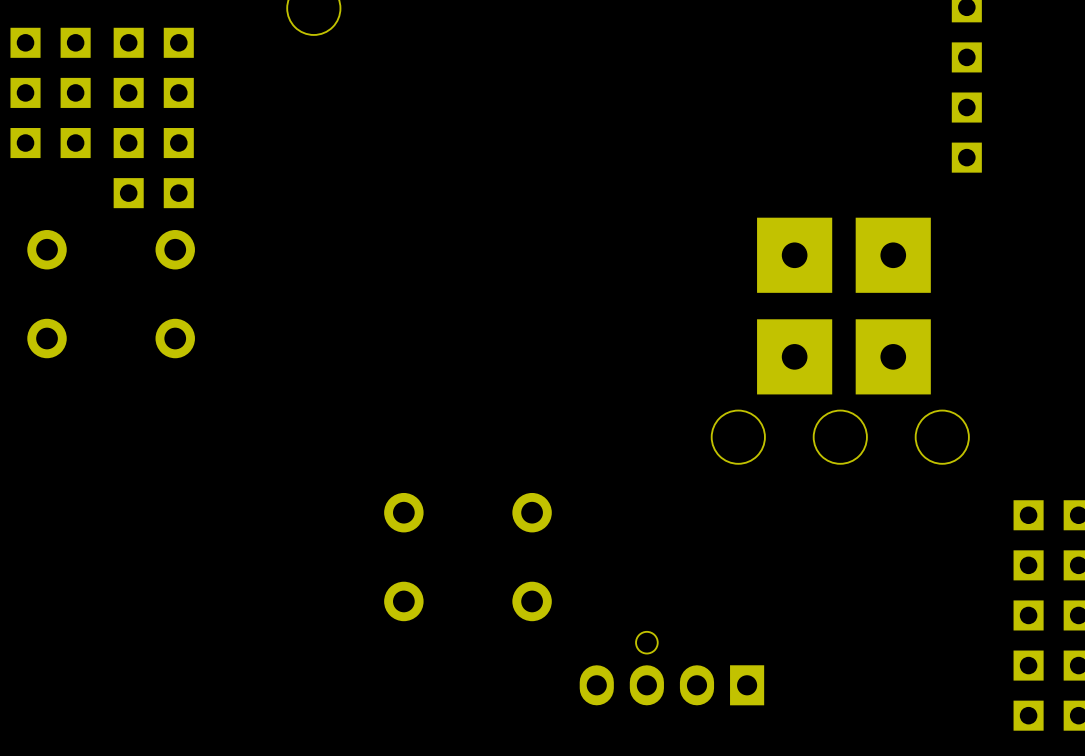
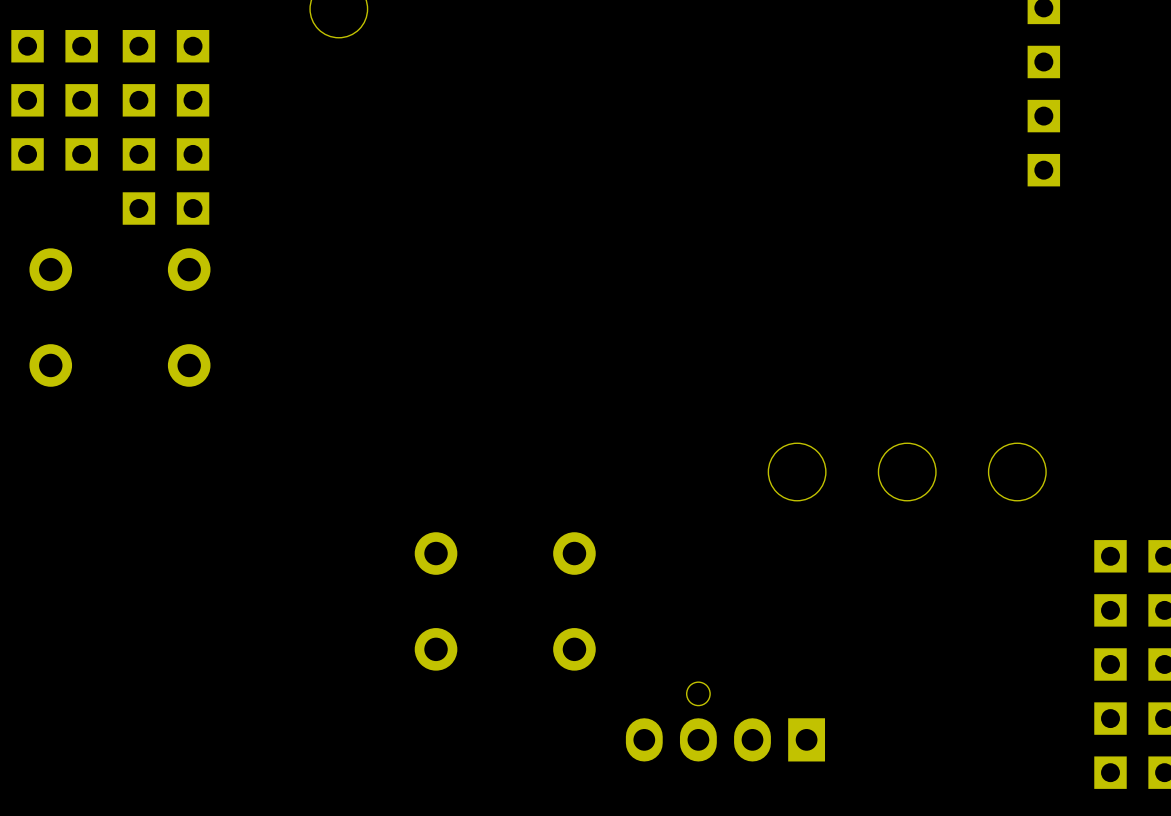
part: (843, 255) -> none
part: (843, 356) -> none

